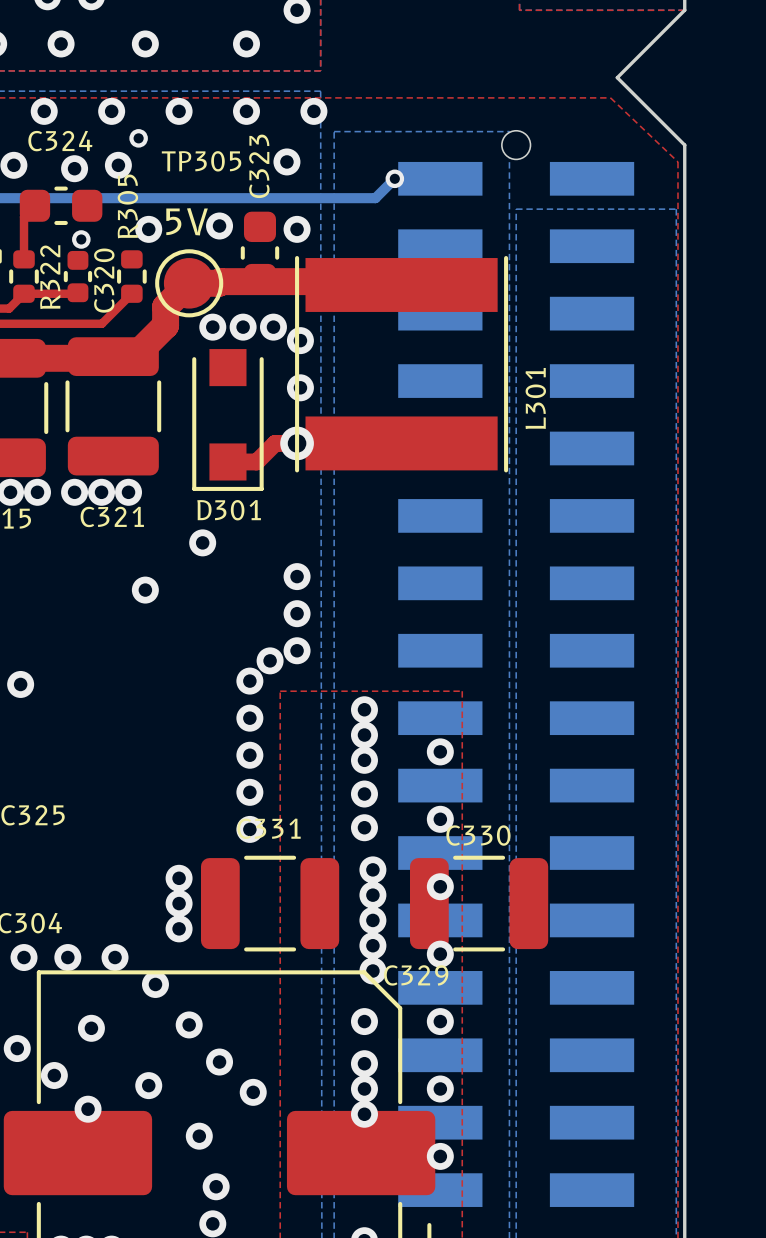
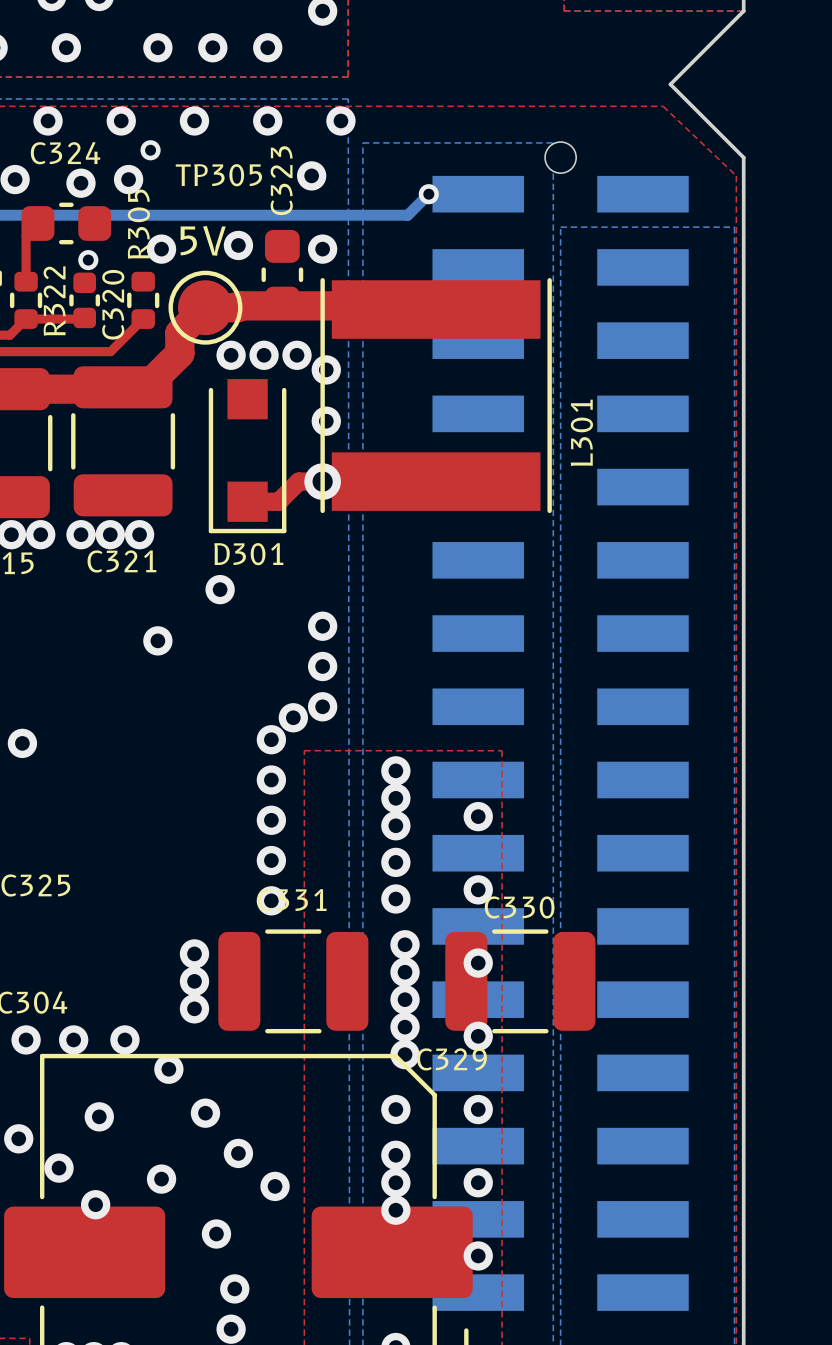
via: none -> (212, 47)

